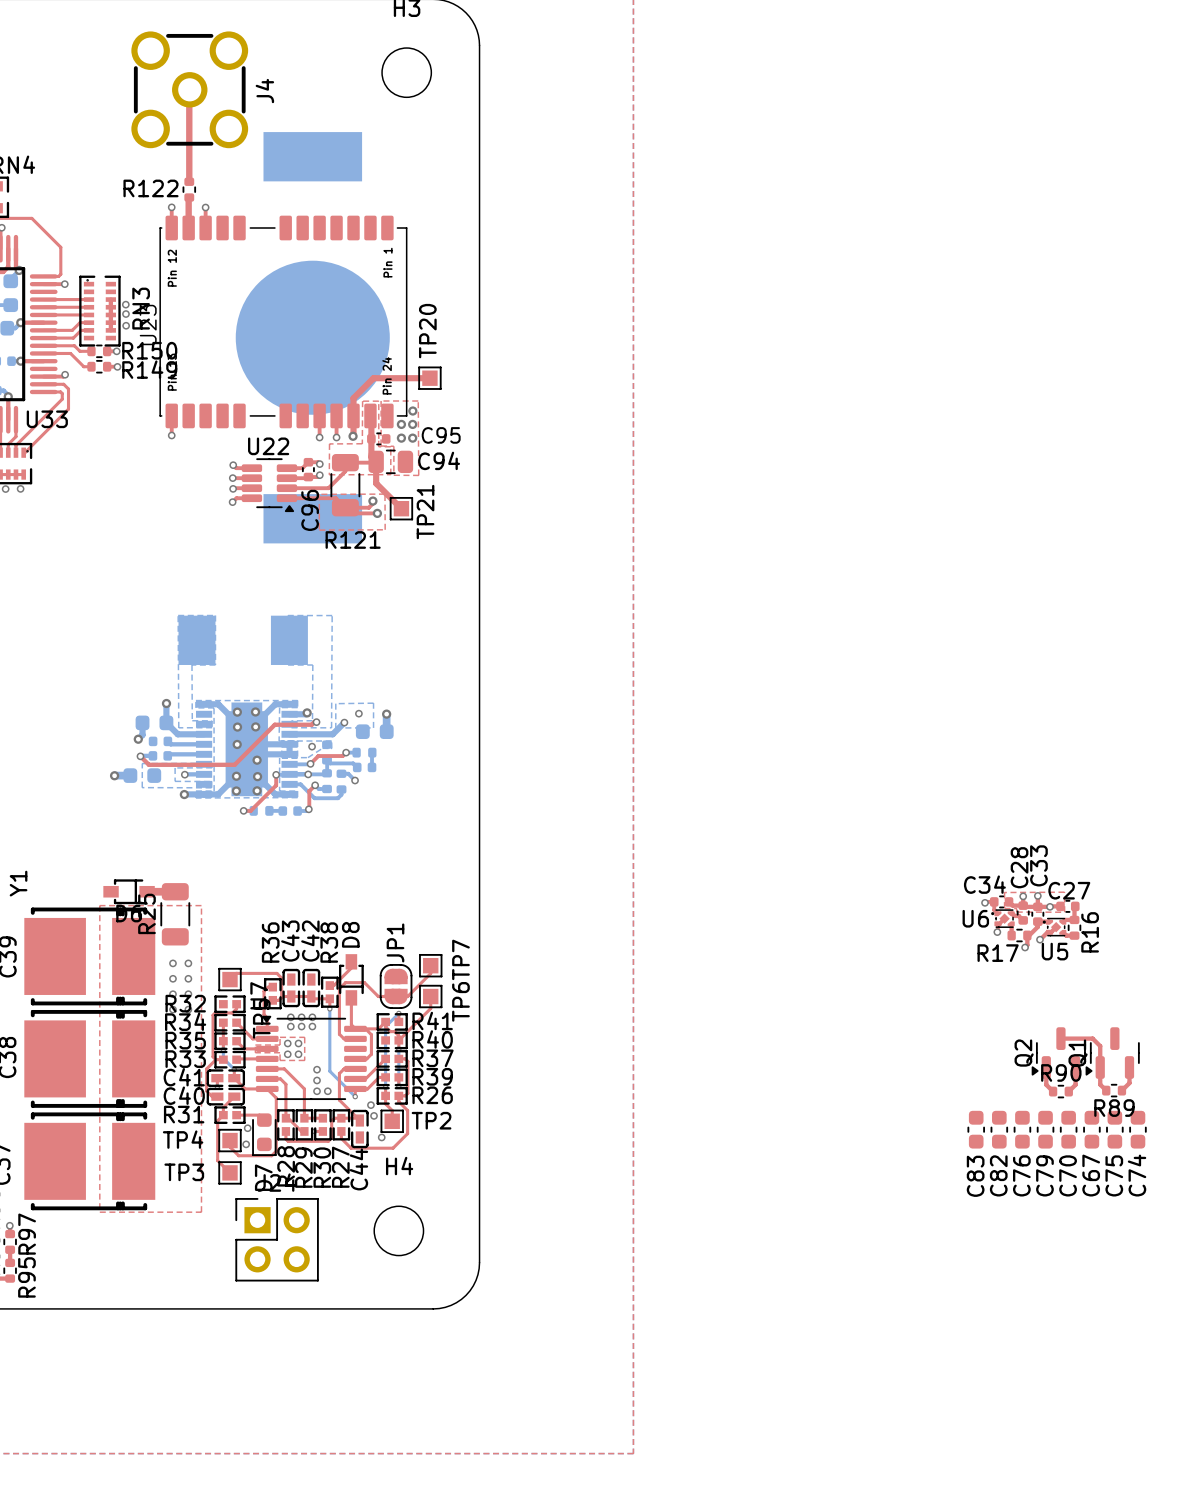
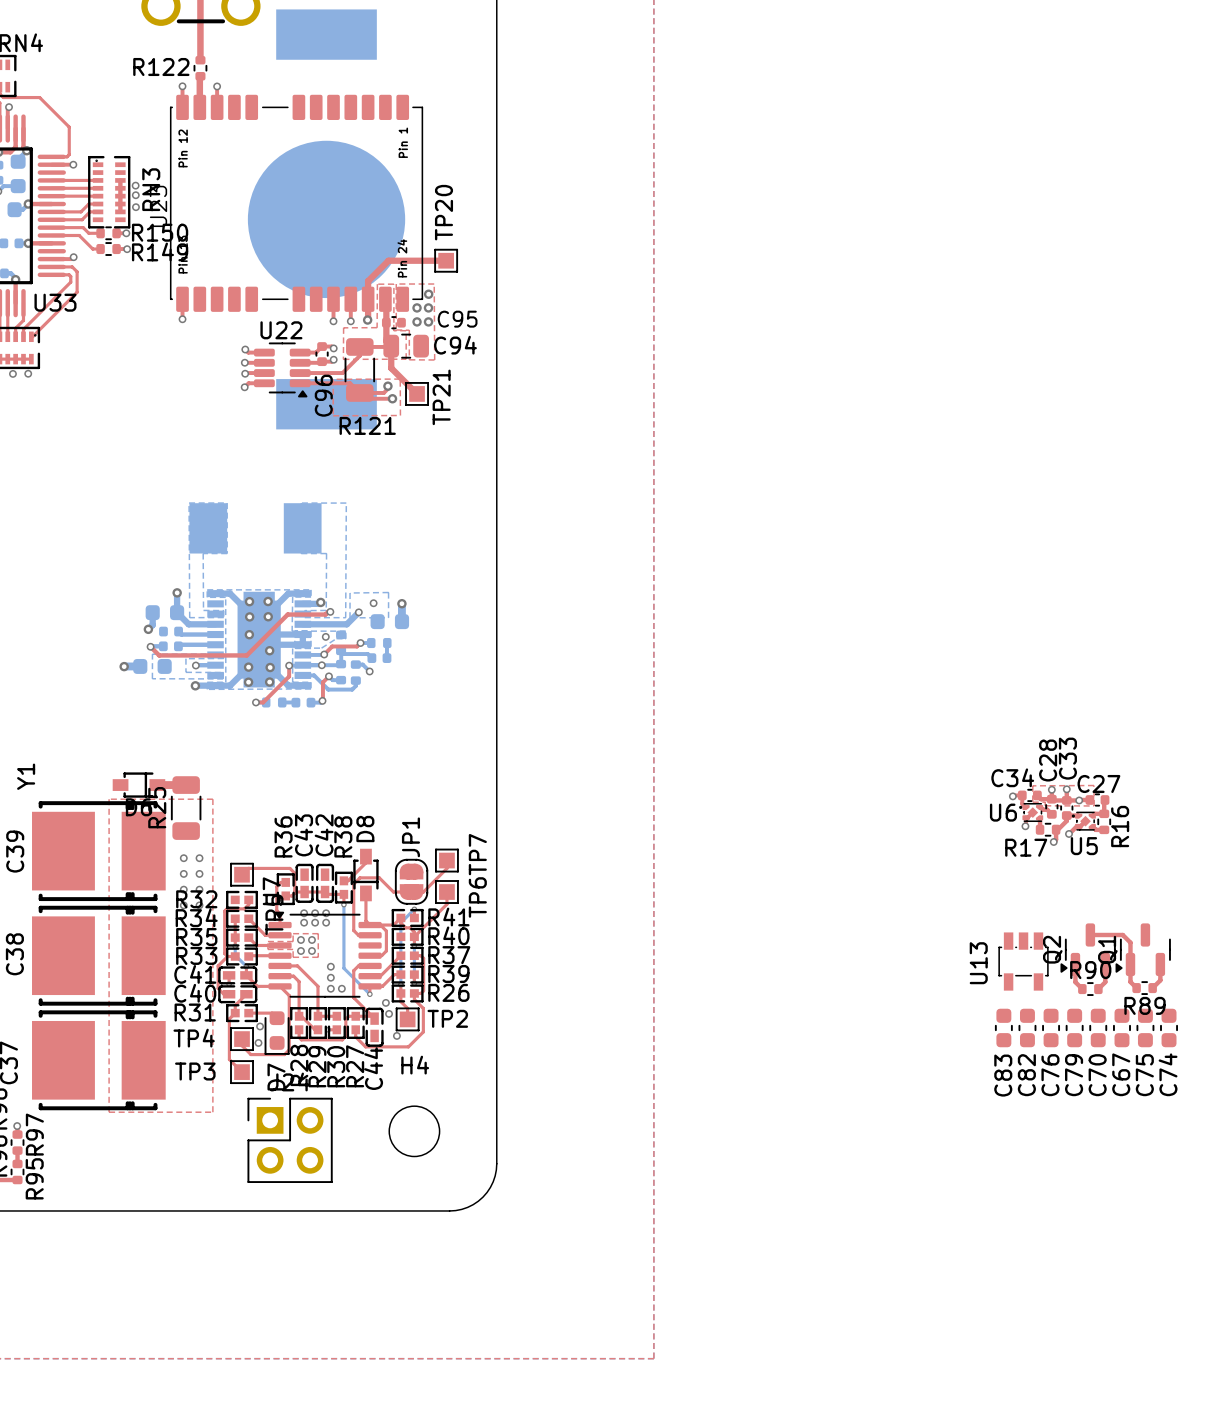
U13: none -> (1023, 961)

